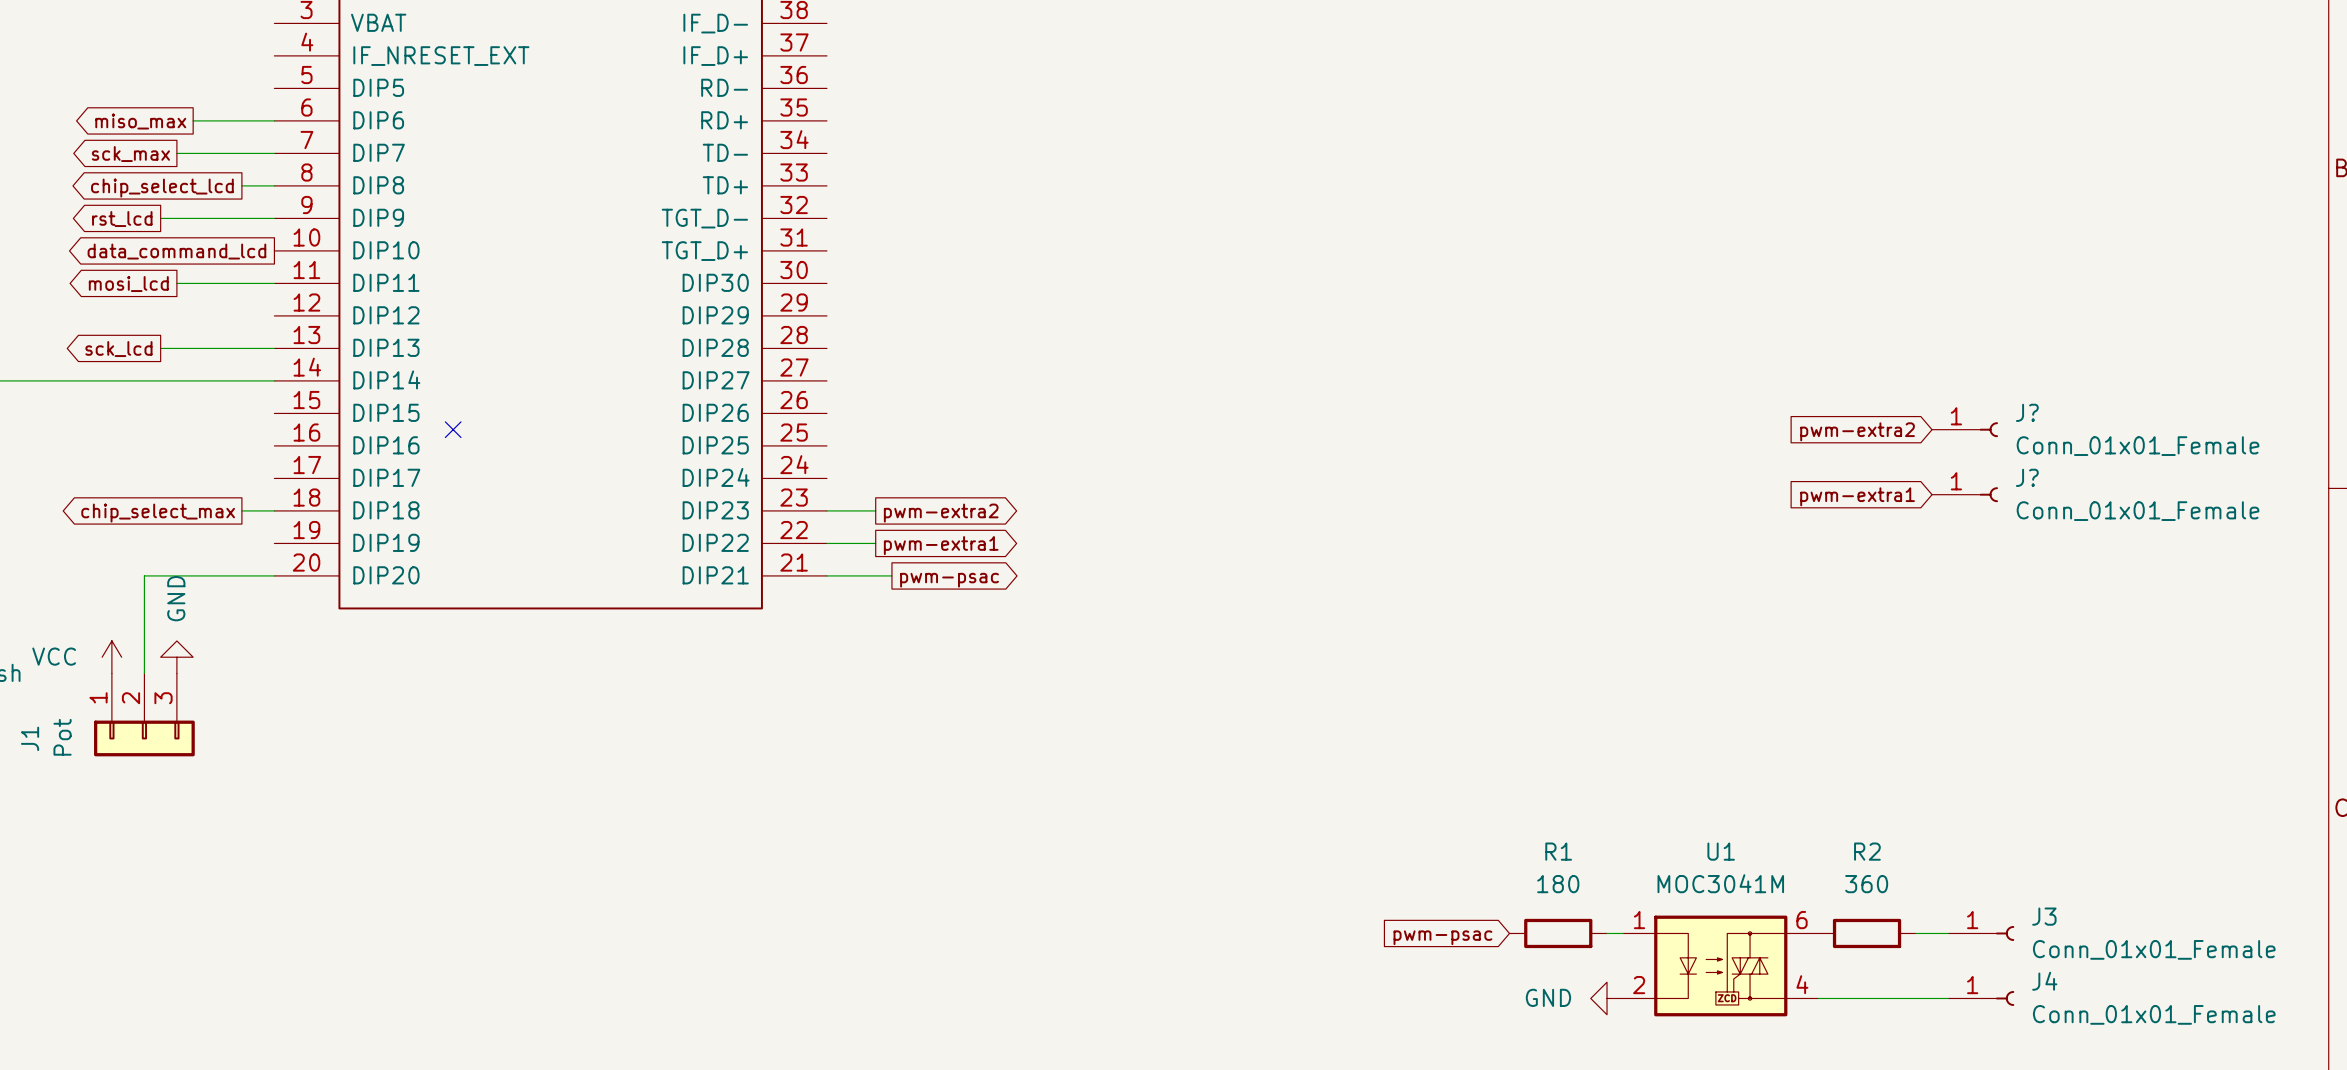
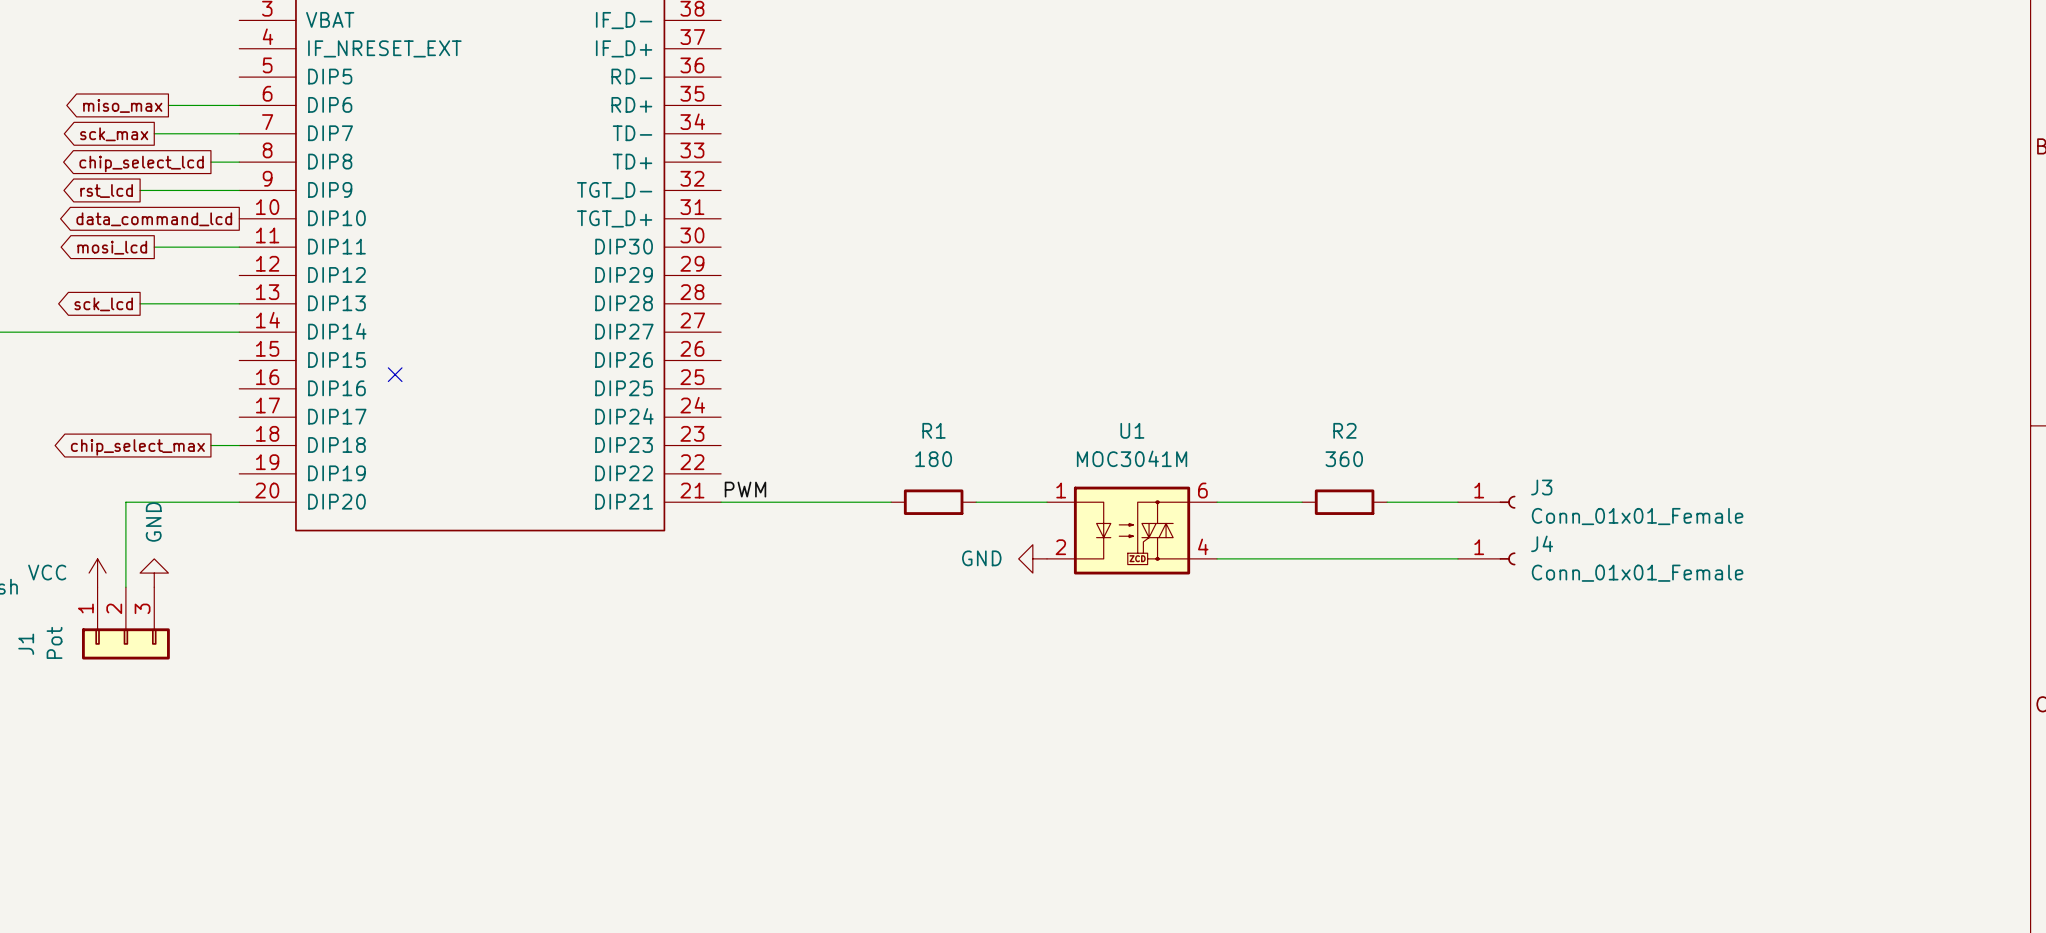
J?: Conn_01x01_Female (1965, 429) -> none
global label: pwm-extra2 (1857, 431) -> none
J?: Conn_01x01_Female (1965, 494) -> none
global label: pwm-extra1 (1857, 496) -> none
wire: (826, 510) (875, 510) -> none
global label: pwm-extra2 (941, 513) -> none
wire: (826, 543) (875, 543) -> none
global label: pwm-extra1 (941, 545) -> none
label: none -> PWM (745, 489)
wire: none -> (777, 502) (891, 502)
wire: none -> (976, 502) (1047, 502)
wire: none -> (1217, 502) (1302, 502)
wire: none -> (1387, 502) (1457, 502)
global label: pwm-psac (949, 580) -> none
power symbol: none -> GND (1032, 558)
wire: none -> (1217, 558) (1457, 558)
R1 position: (1558, 933) -> (933, 502)
wire: (1607, 933) (1623, 933) -> none
R2 position: (1867, 933) -> (1344, 502)
wire: (1915, 933) (1948, 933) -> none
J3 position: (1981, 933) -> (1486, 502)
global label: pwm-psac (1442, 937) -> none
U1 position: (1720, 965) -> (1132, 530)
power symbol: GND (1607, 998) -> none
wire: (1818, 998) (1948, 998) -> none
J4 position: (1981, 998) -> (1486, 558)

